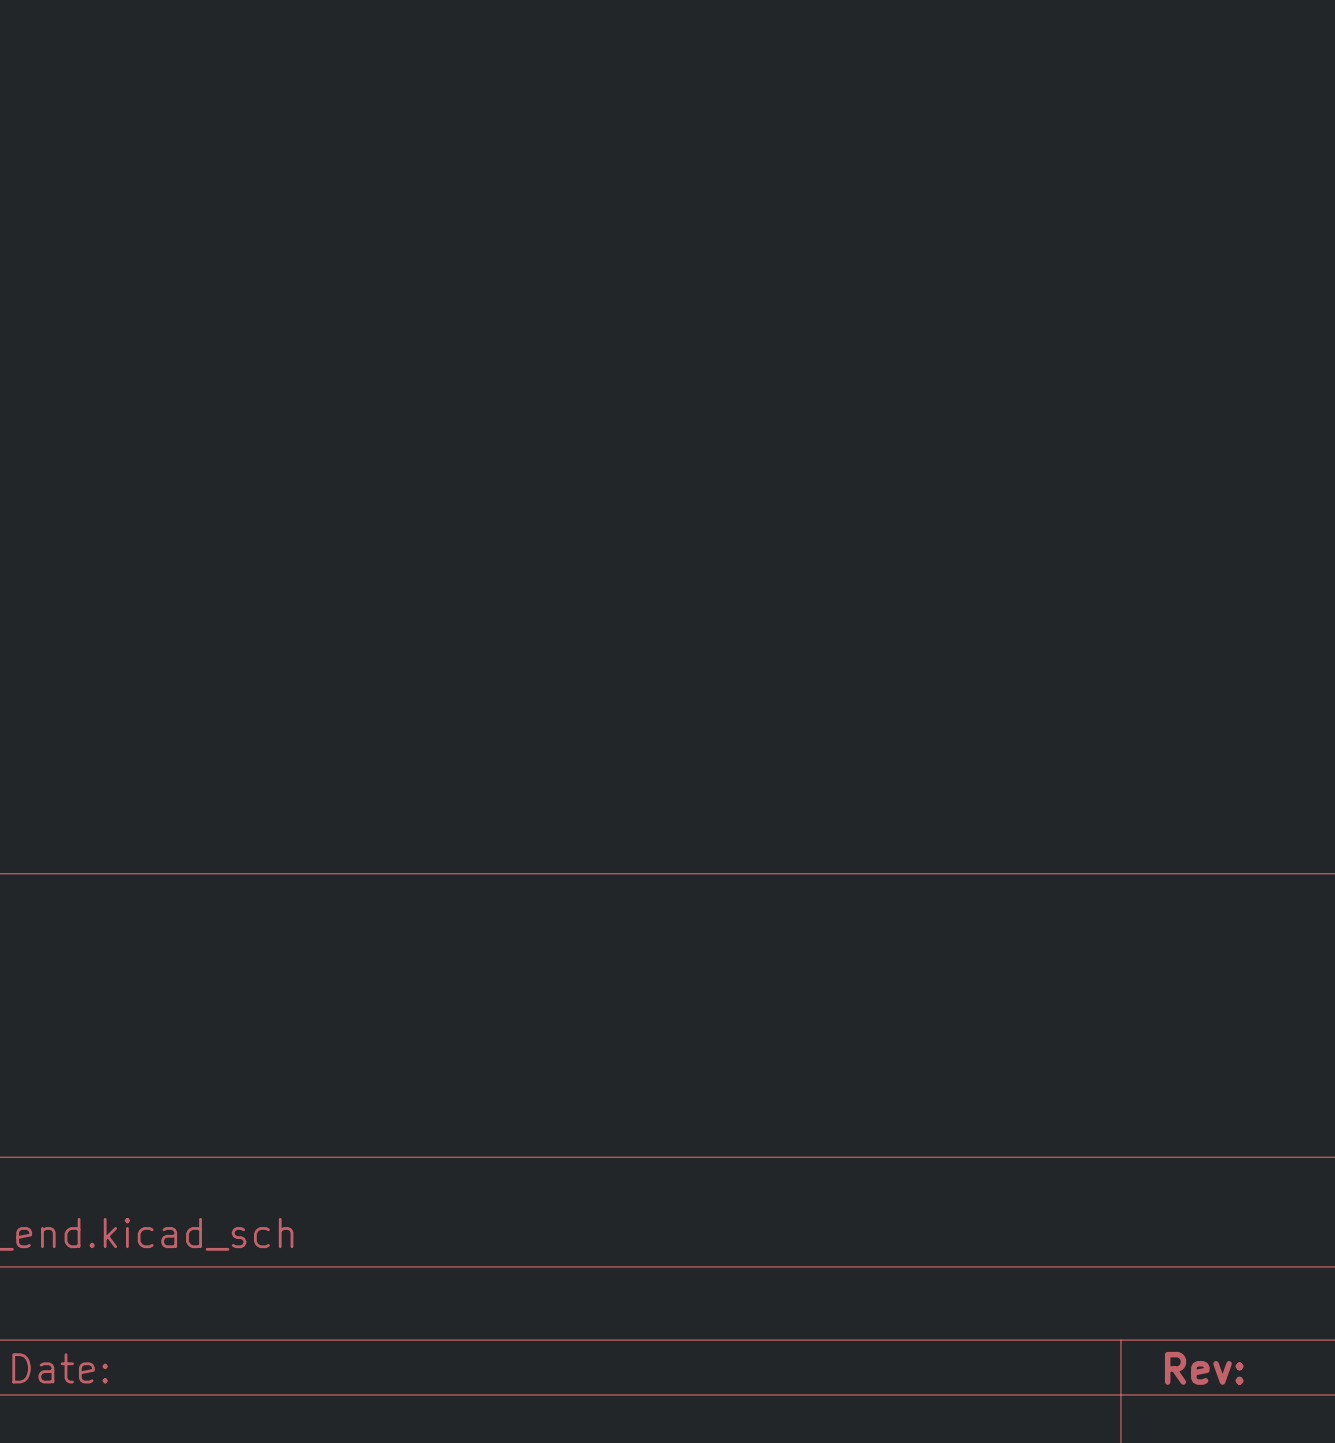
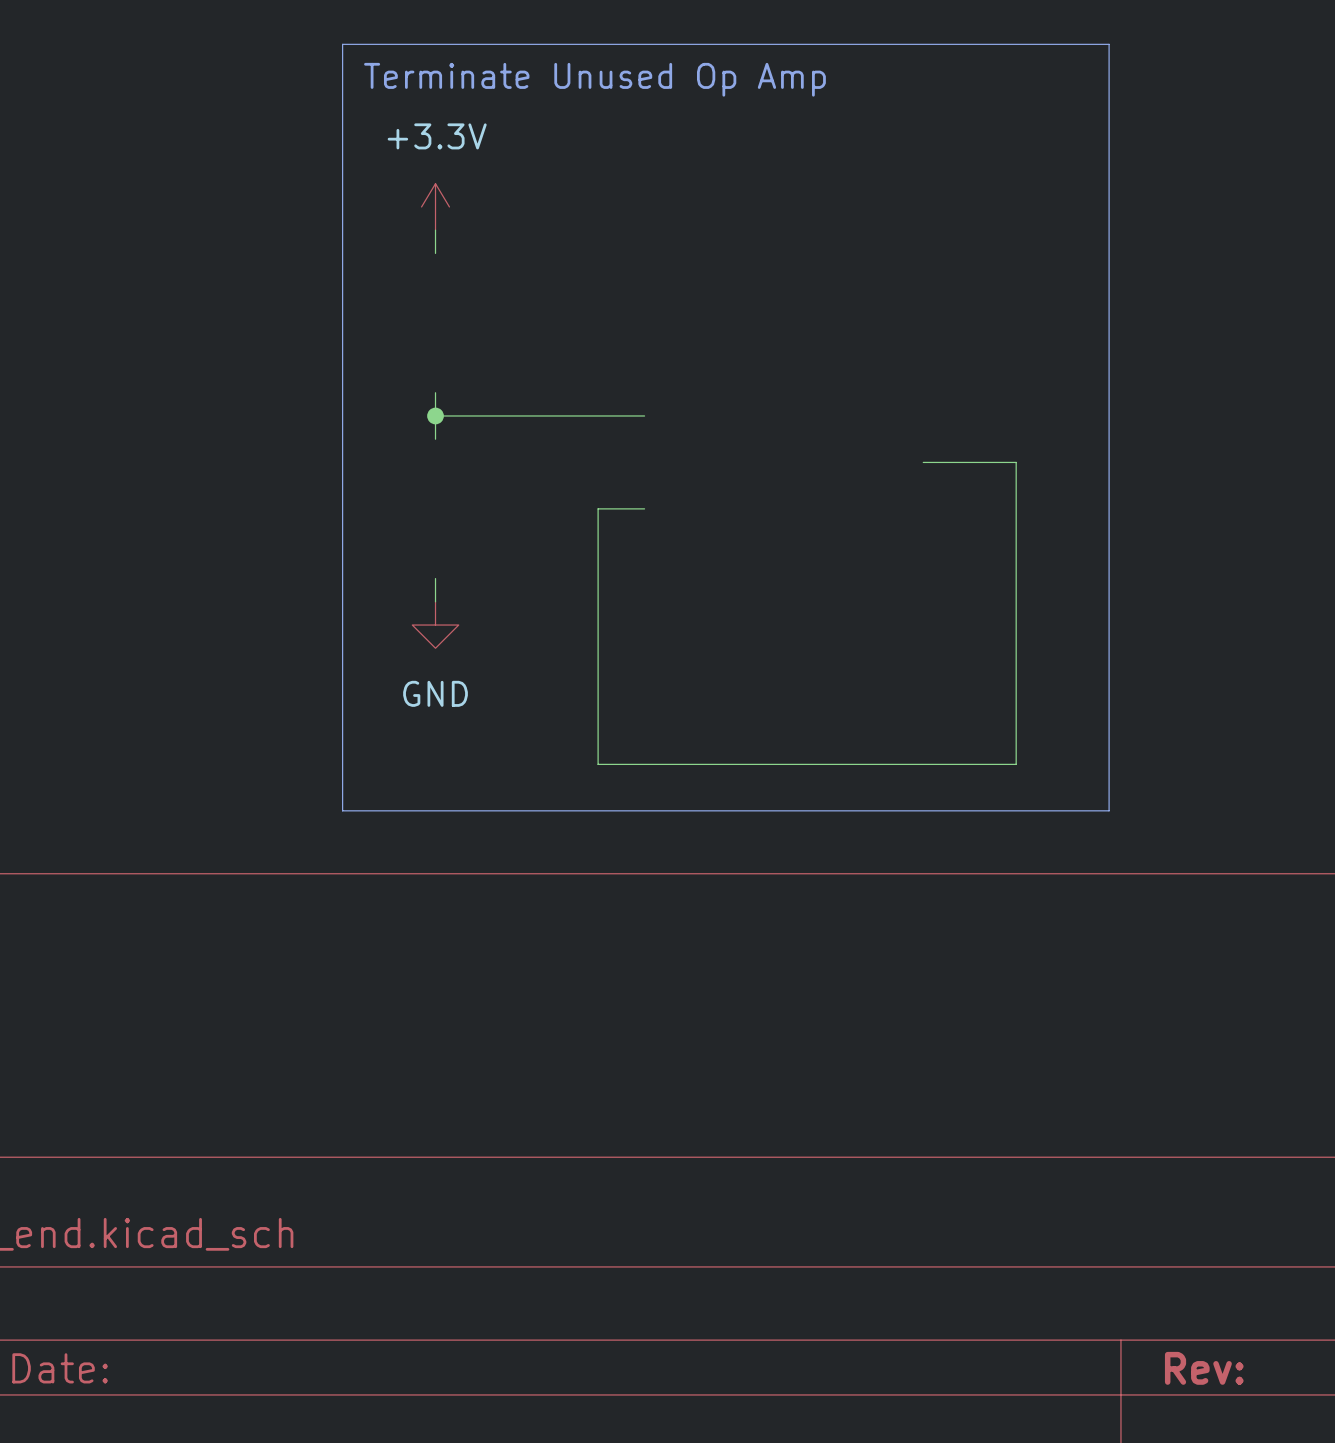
line: none -> (342, 44) (1109, 44) (1109, 810) (342, 810) (342, 44)
text: none -> Terminate Unused Op Amp (594, 79)
power symbol: none -> +3.3V (435, 206)
wire: none -> (435, 230) (435, 253)
wire: none -> (435, 392) (435, 439)
wire: none -> (435, 415) (644, 415)
junction: none -> (435, 415)
wire: none -> (923, 462) (1016, 462) (1016, 764) (598, 764) (598, 508) (644, 508)
wire: none -> (435, 578) (435, 601)
power symbol: none -> GND (435, 625)

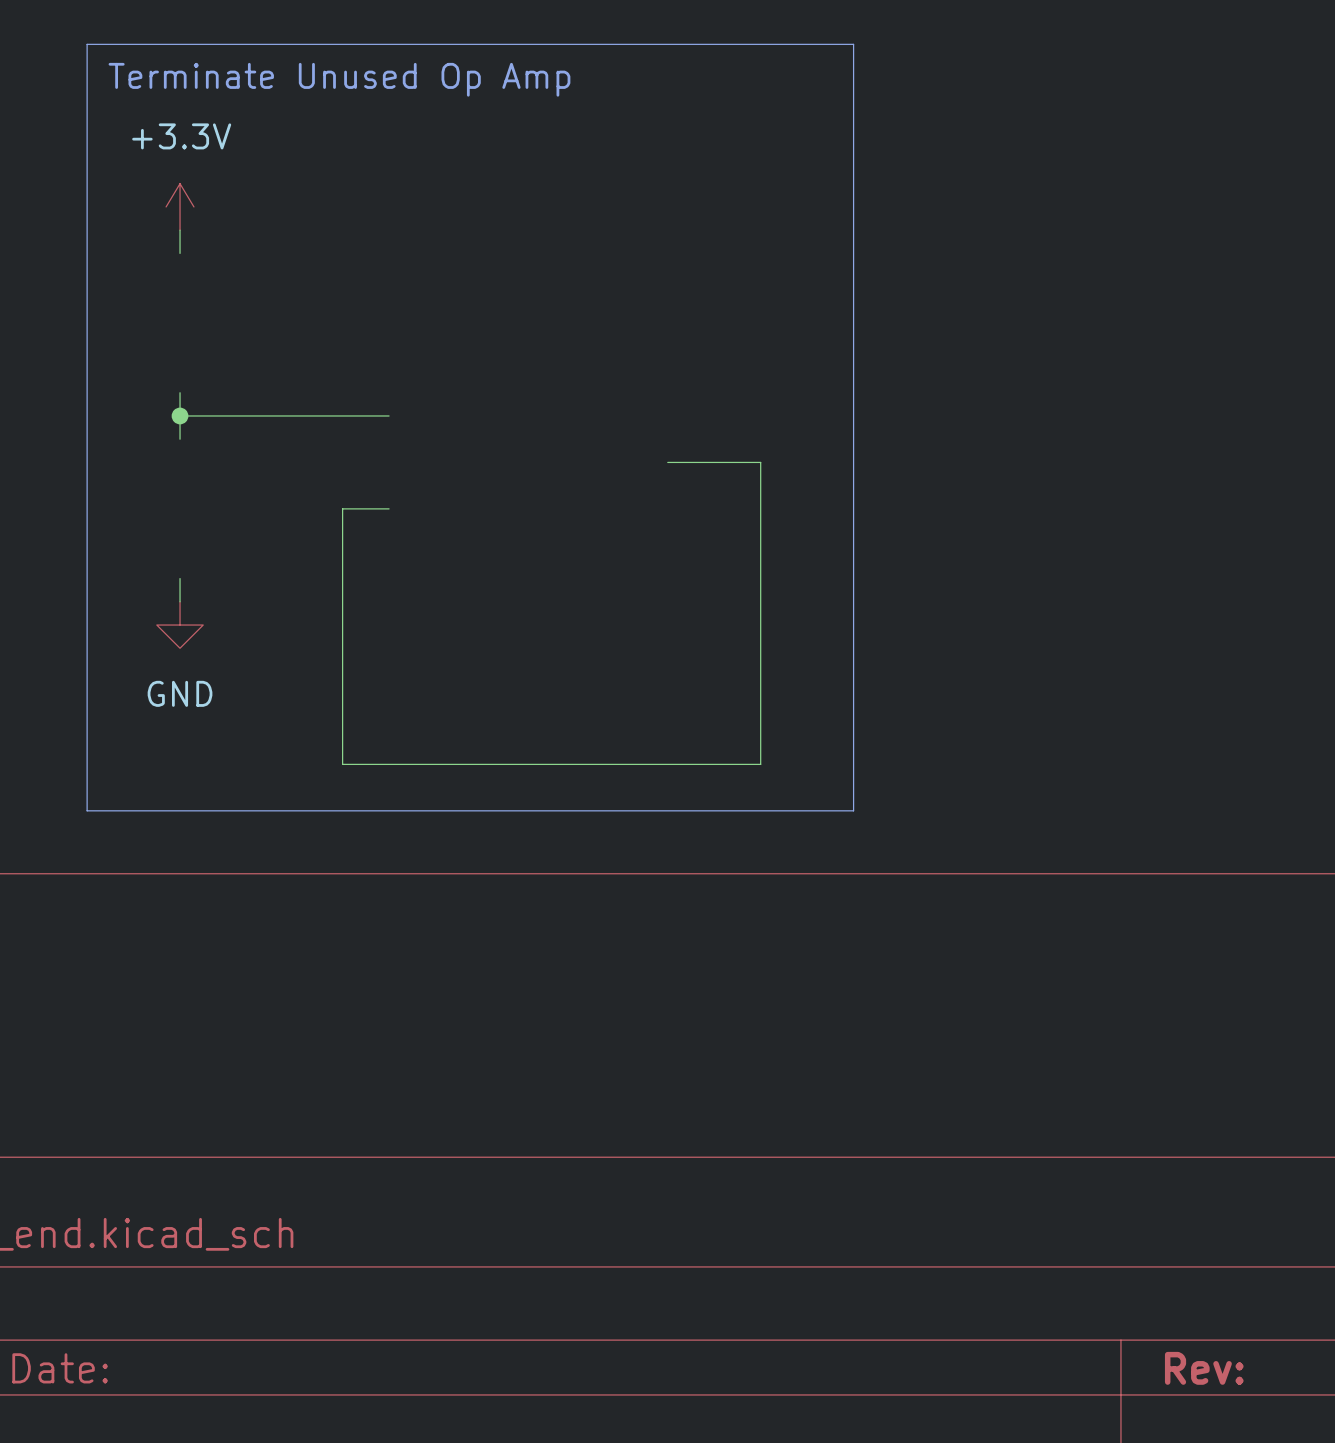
line: (342, 44) (342, 810) -> (342, 44) (87, 44) (87, 810) (342, 810)
line: (853, 44) (1109, 44) (1109, 810) (853, 810) -> (853, 44) (853, 810)
text position: Terminate Unused Op Amp (594, 79) -> Terminate Unused Op Amp (339, 79)
power symbol position: +3.3V (435, 206) -> +3.3V (180, 206)
wire: (435, 230) (435, 253) -> (180, 230) (180, 253)
wire: (435, 392) (435, 439) -> (180, 392) (180, 439)
junction: none -> (180, 415)
wire: (435, 415) (644, 415) -> (180, 415) (389, 415)
junction: (435, 415) -> none
wire: (923, 462) (1016, 462) (1016, 764) (760, 764) -> (667, 462) (760, 462) (760, 764)
wire: (644, 508) (598, 508) (598, 764) -> (389, 508) (342, 508) (342, 764) (598, 764)
wire: (435, 578) (435, 601) -> (180, 578) (180, 601)
power symbol position: GND (435, 625) -> GND (180, 625)

